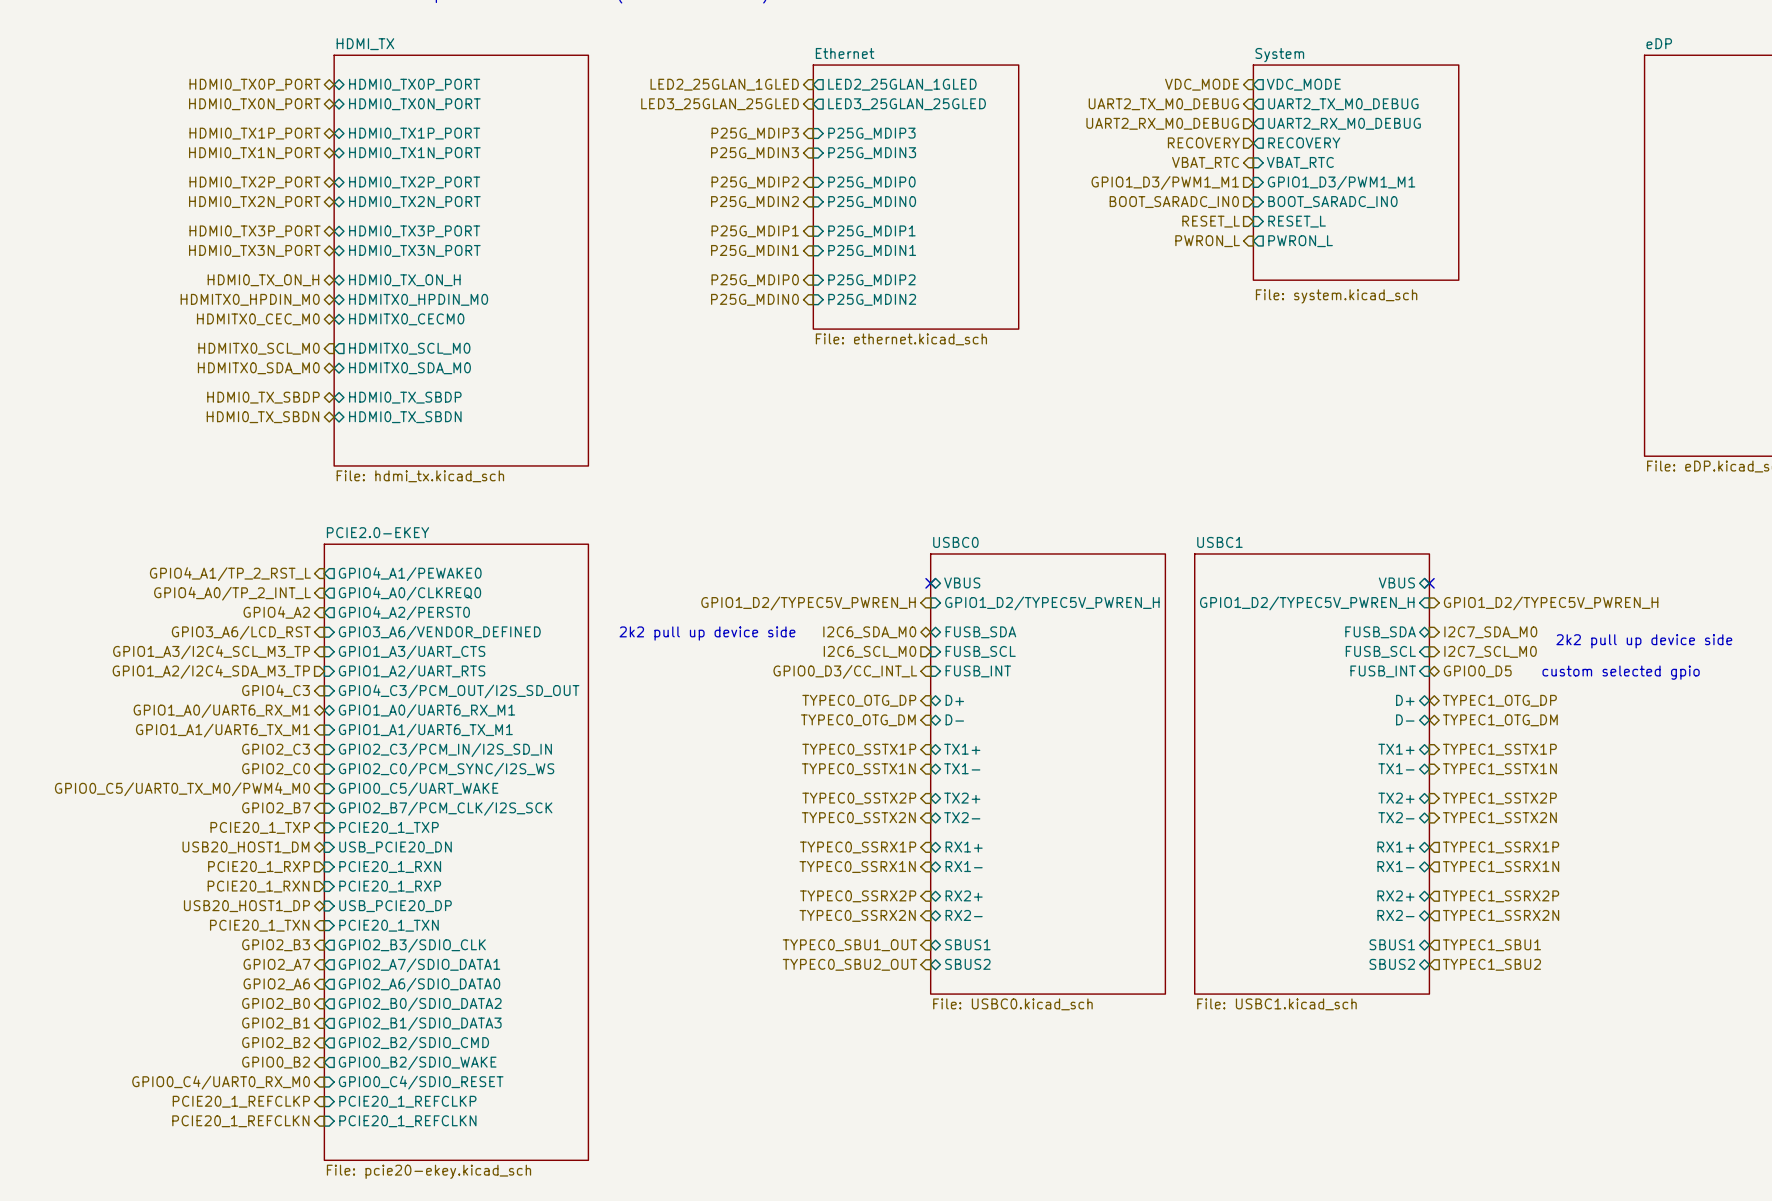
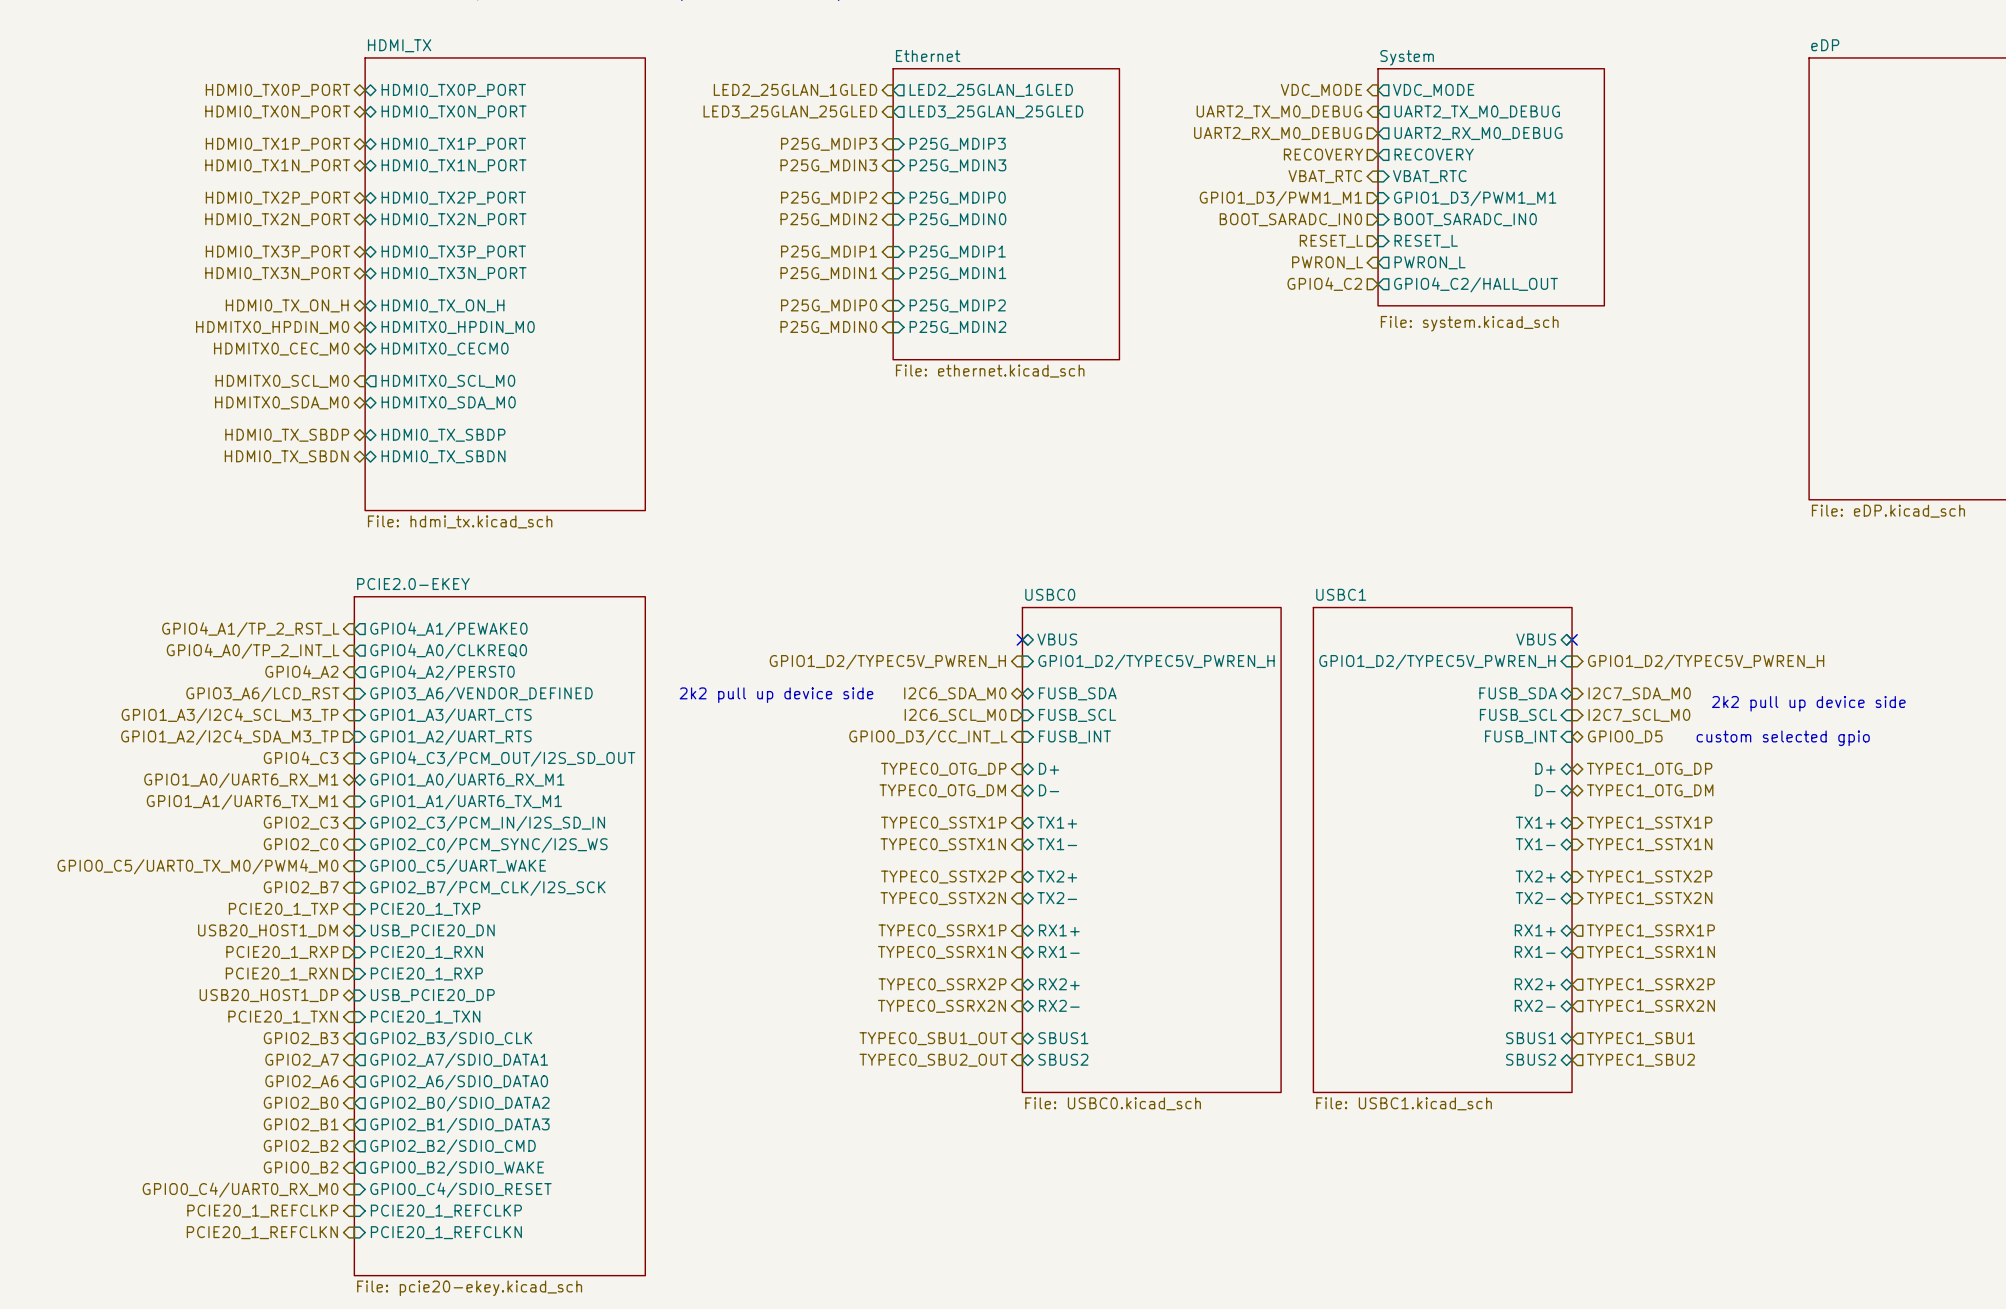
hierarchical label: none -> GPIO4_C2 (1324, 284)
sheet pin: none -> GPIO4_C2/HALL_OUT (1475, 284)

